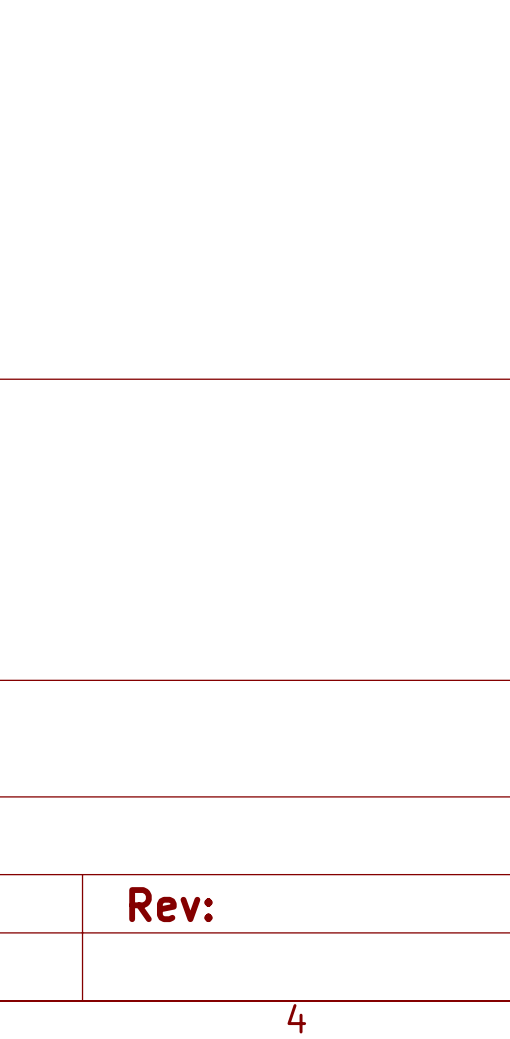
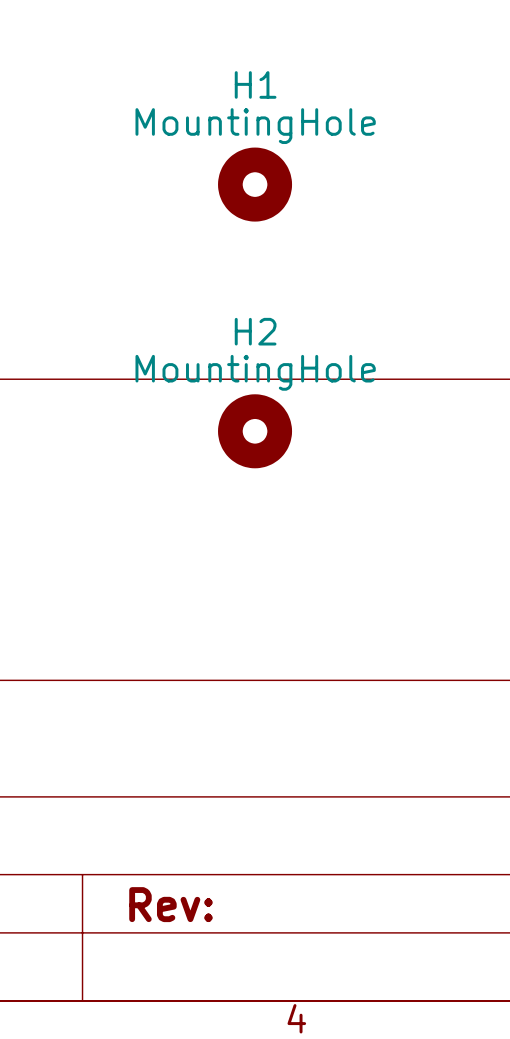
H1: none -> MountingHole (255, 184)
H2: none -> MountingHole (255, 431)

